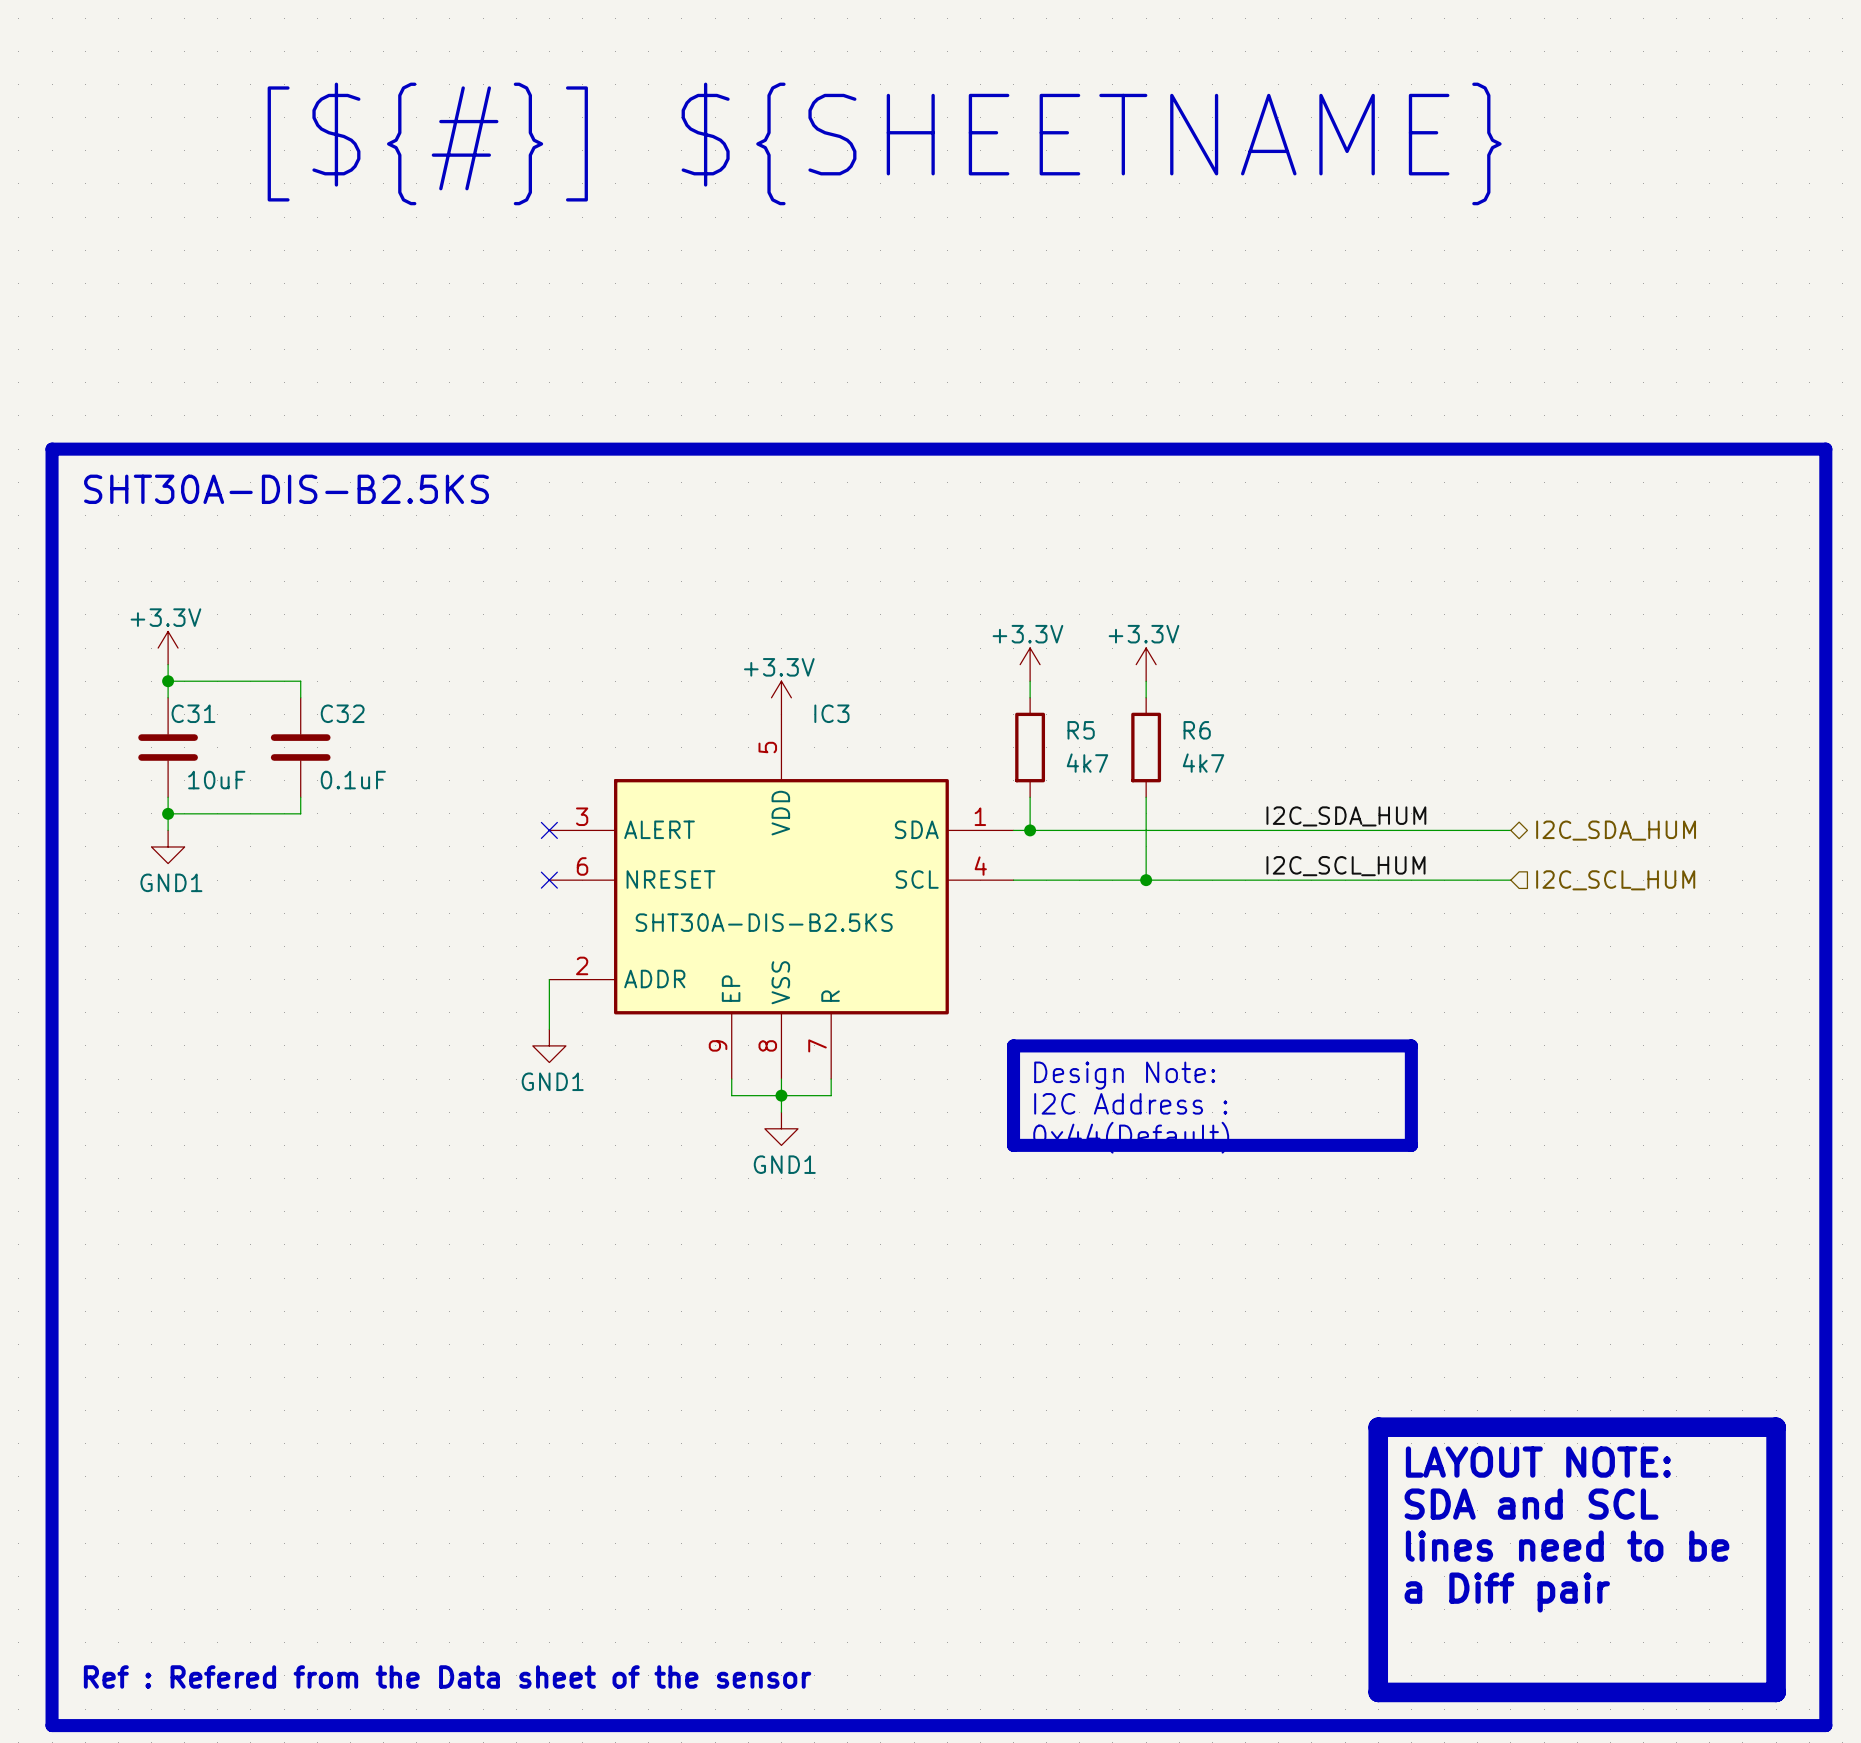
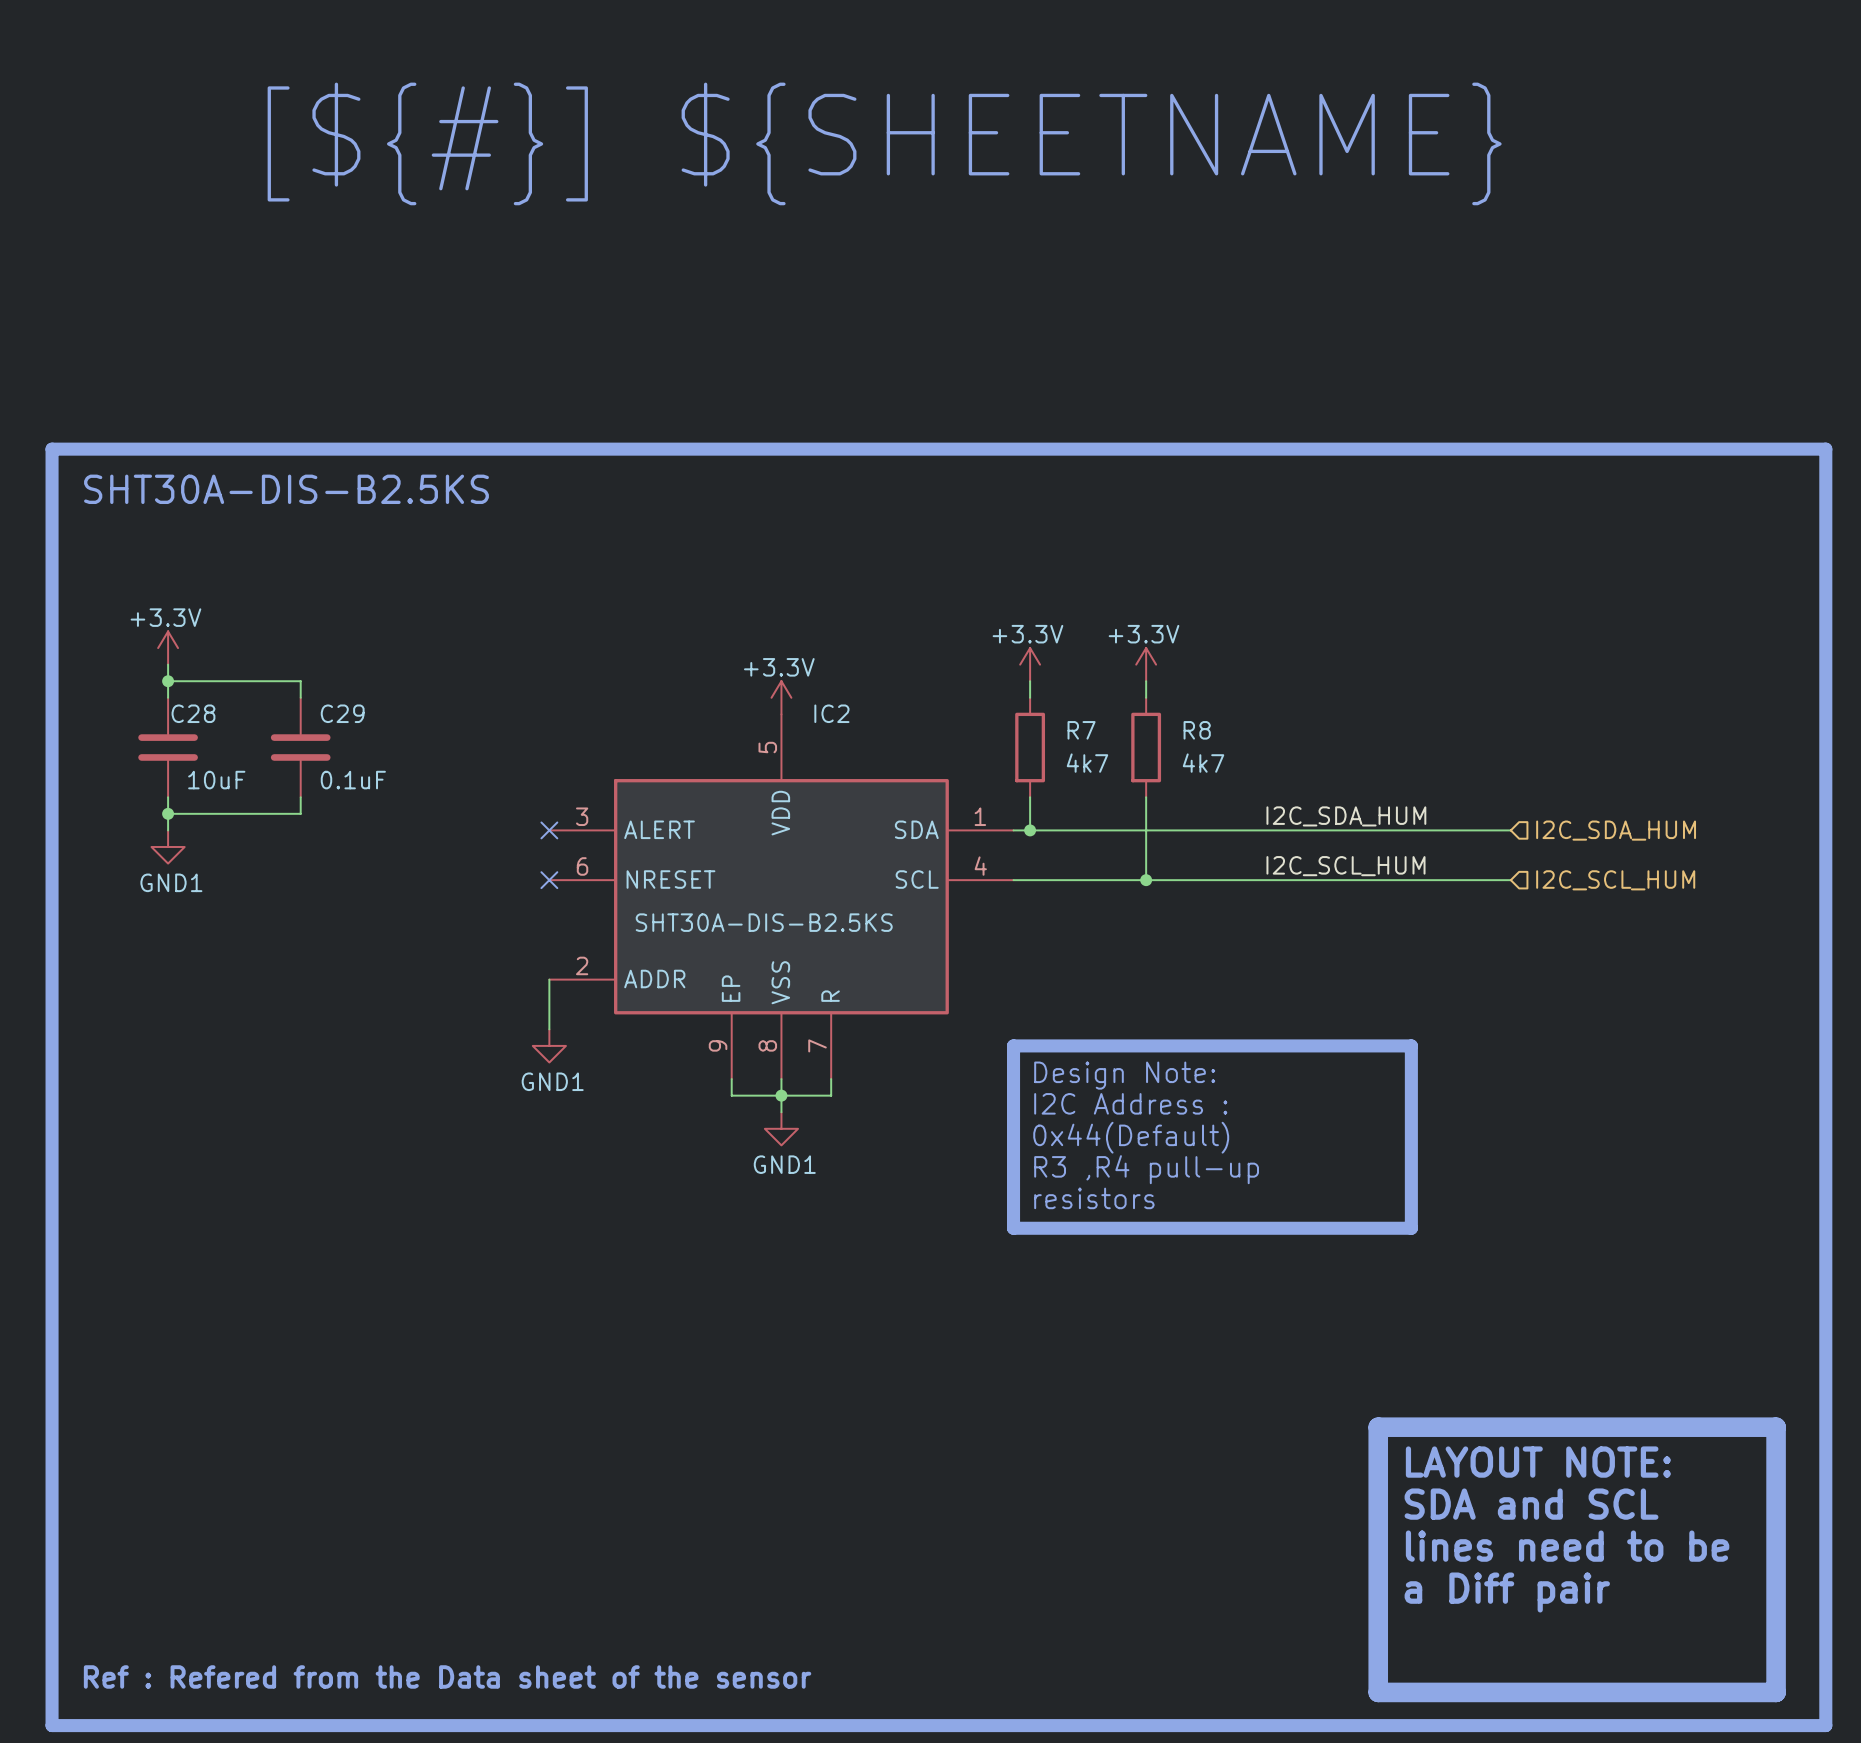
C31 name: C31 (193, 713) -> C28 (193, 713)
C32 name: C32 (342, 713) -> C29 (342, 713)
IC3 name: IC3 (831, 713) -> IC2 (831, 713)
R5 name: R5 (1081, 730) -> R7 (1081, 730)
R6 name: R6 (1197, 730) -> R8 (1197, 730)
hierarchical label shape: bidirectional (1616, 830) -> input (1616, 830)
line: (1013, 1145) (1411, 1145) -> (1013, 1145) (1013, 1228) (1411, 1228) (1411, 1145)
text: none -> R3 ,R4 pull-up (1146, 1169)
text: none -> resistors (1094, 1198)

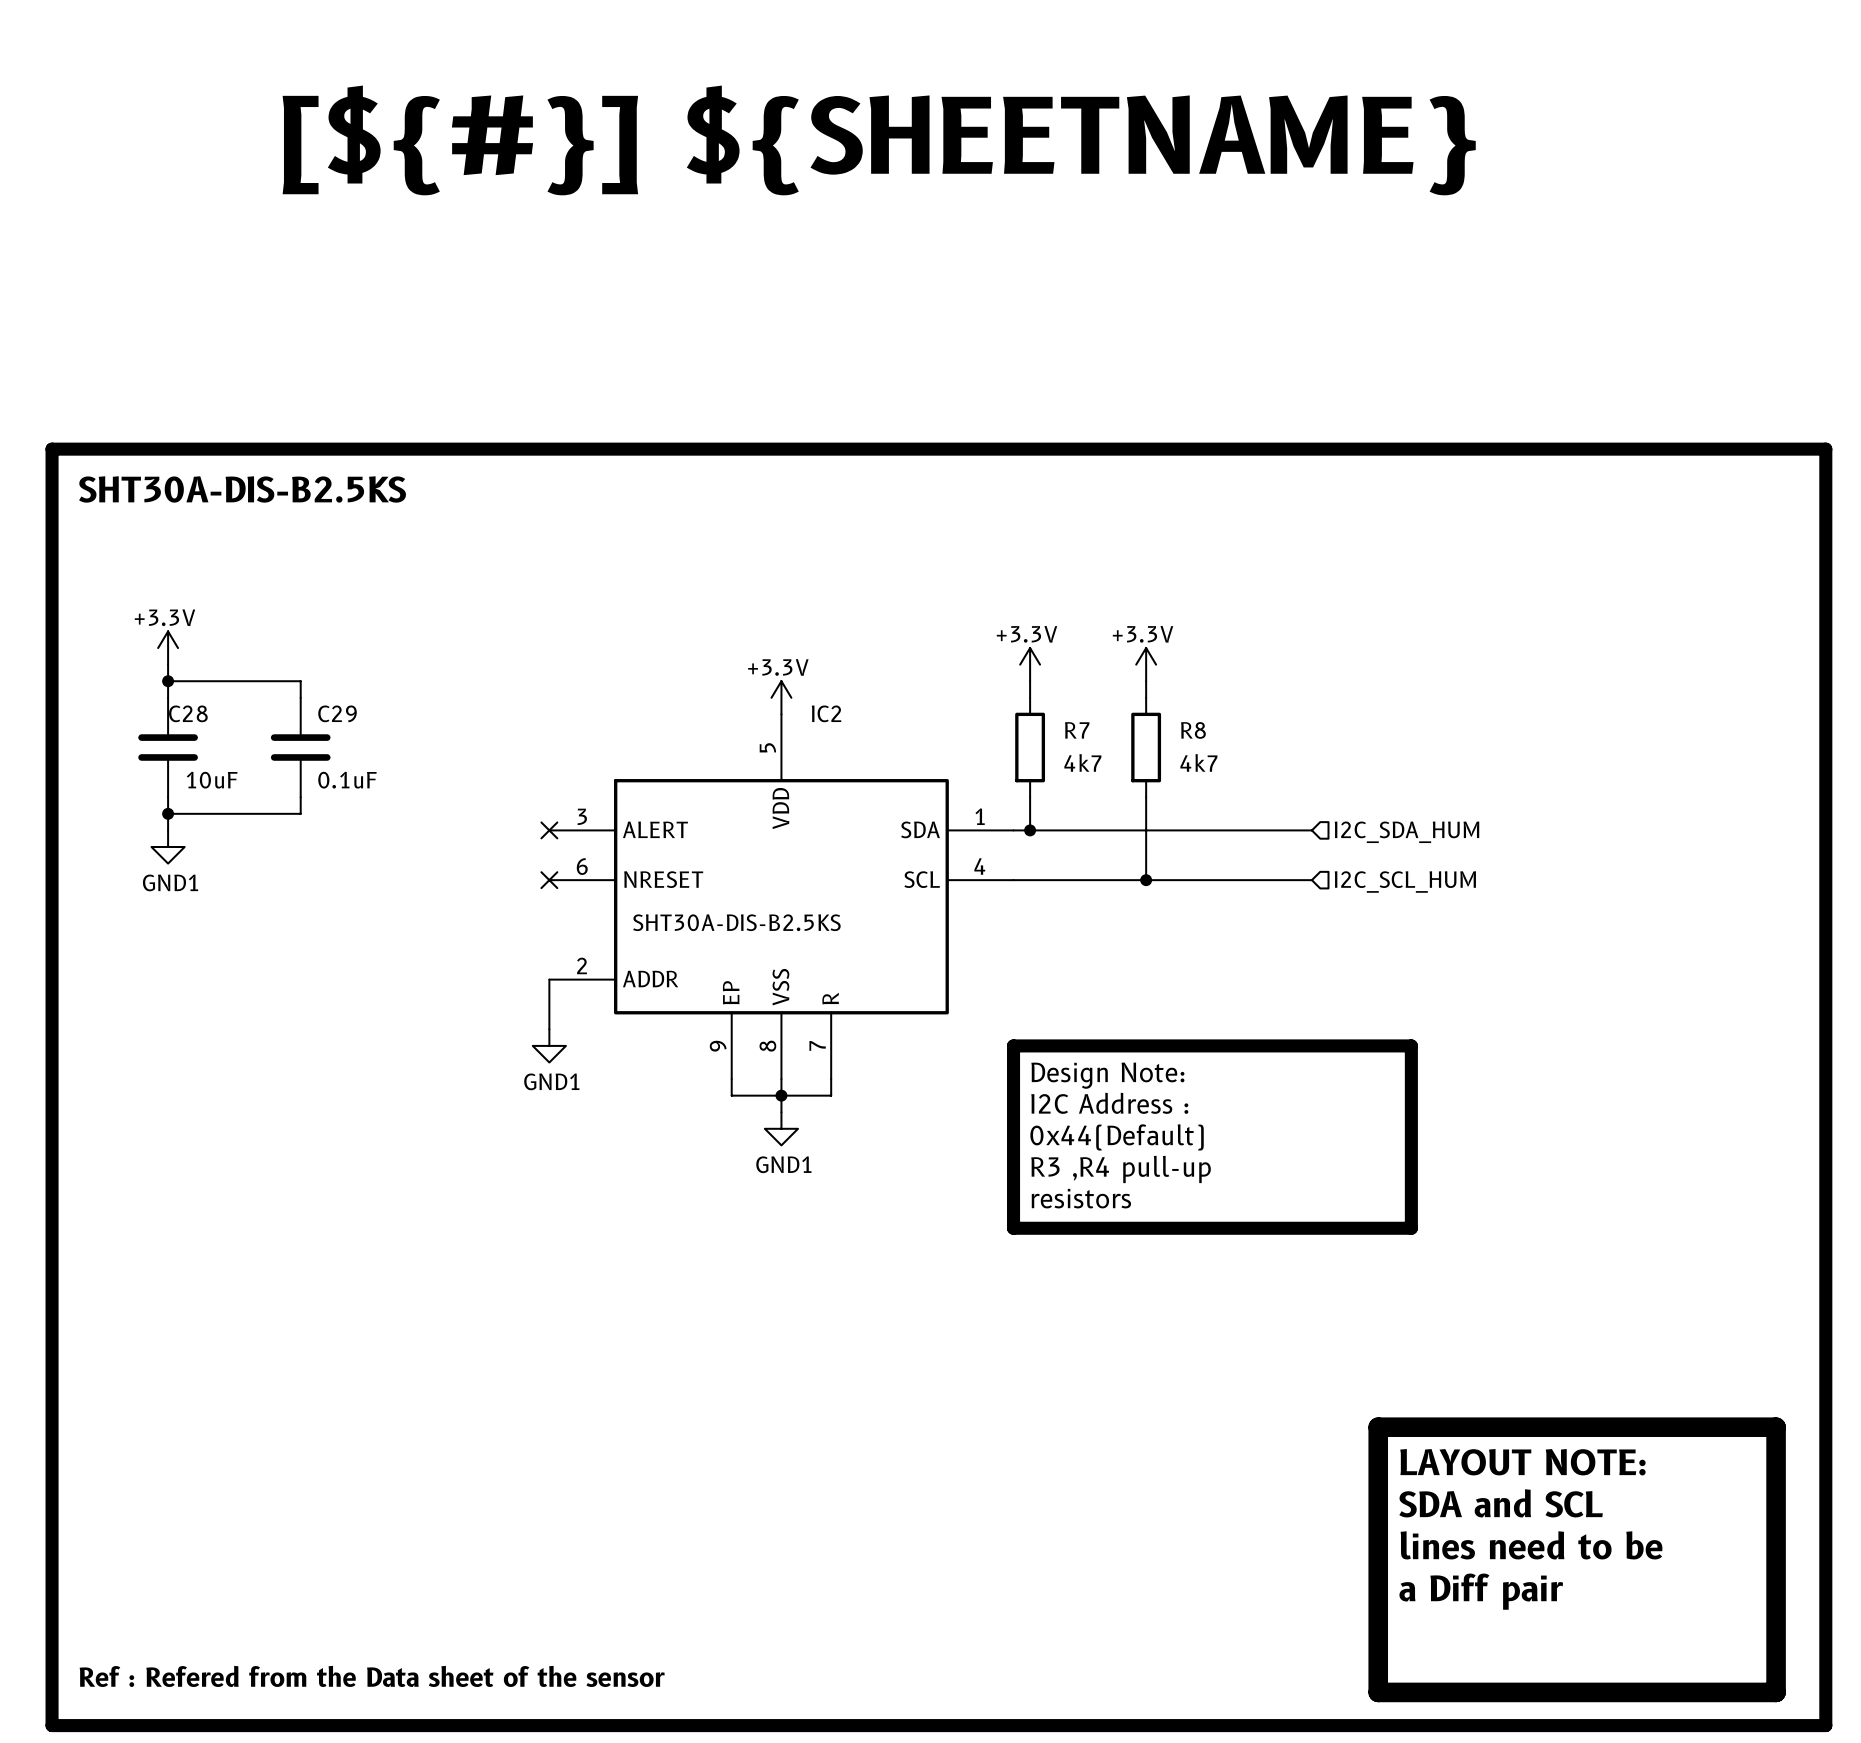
label: I2C_SDA_HUM (1346, 816) -> none
wire: (1311, 830) (1510, 830) -> none
hierarchical label position: I2C_SDA_HUM (1616, 830) -> I2C_SDA_HUM (1406, 832)
label: I2C_SCL_HUM (1345, 866) -> none
wire: (1311, 880) (1510, 880) -> none
hierarchical label position: I2C_SCL_HUM (1615, 880) -> I2C_SCL_HUM (1405, 882)

